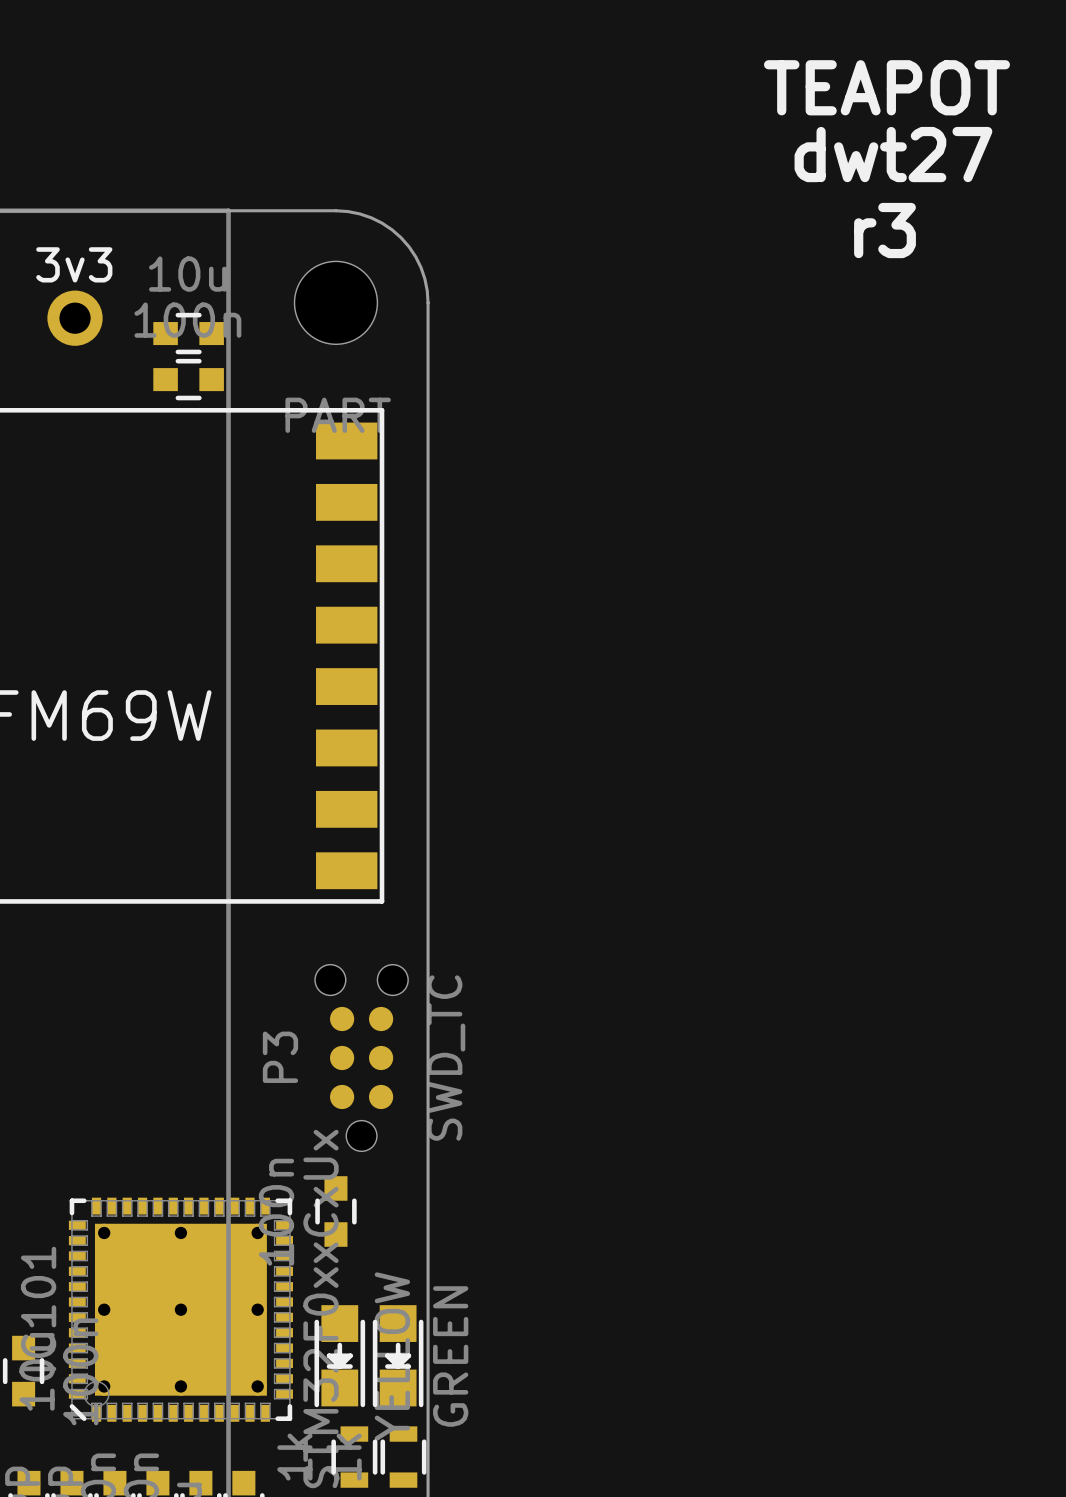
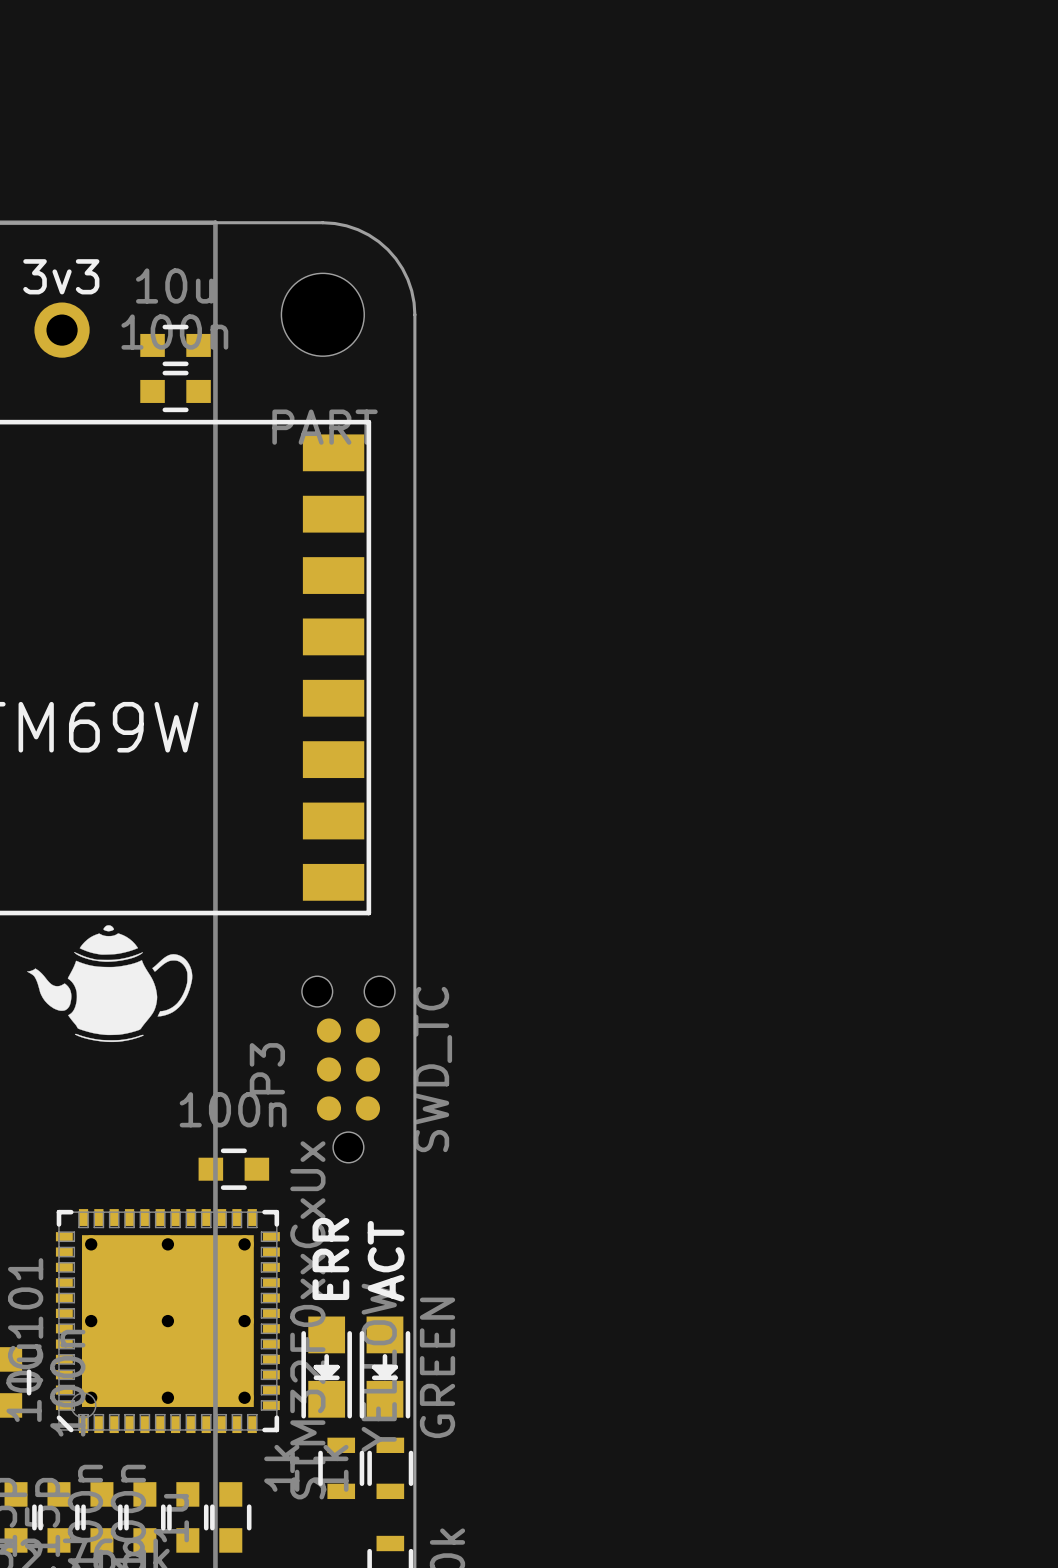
text: TEAPOT (886, 87) -> none
text: dwt27 (893, 154) -> none
text: r3 (885, 230) -> none
drawing: none -> [27, 925, 193, 1043]
part rotation: 0° (335, 1211) -> 90° clockwise (233, 1169)
part position: (335, 1211) -> (233, 1169)
text: none -> ERR (330, 1258)
text: none -> ACT (386, 1261)

